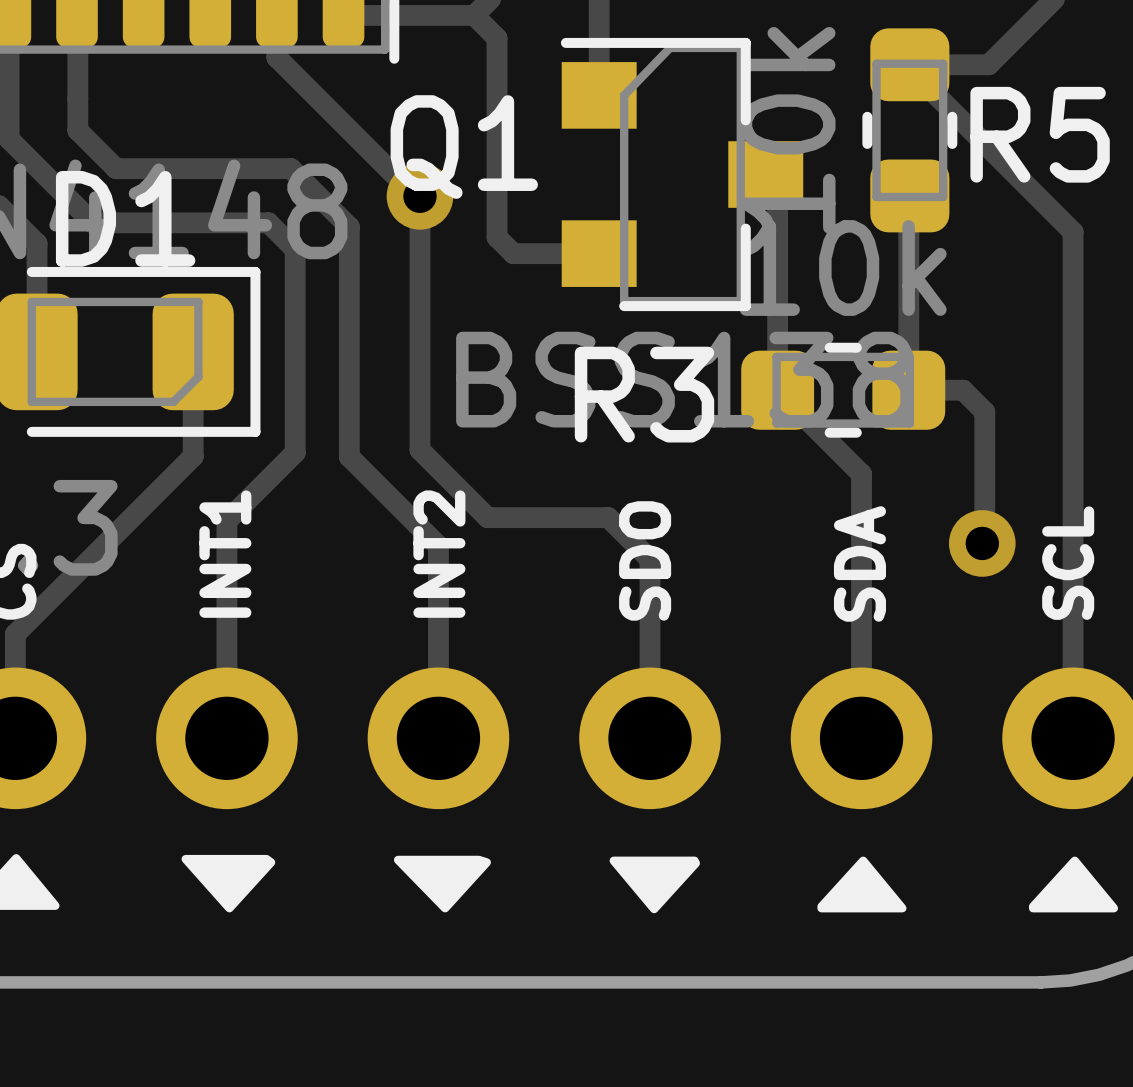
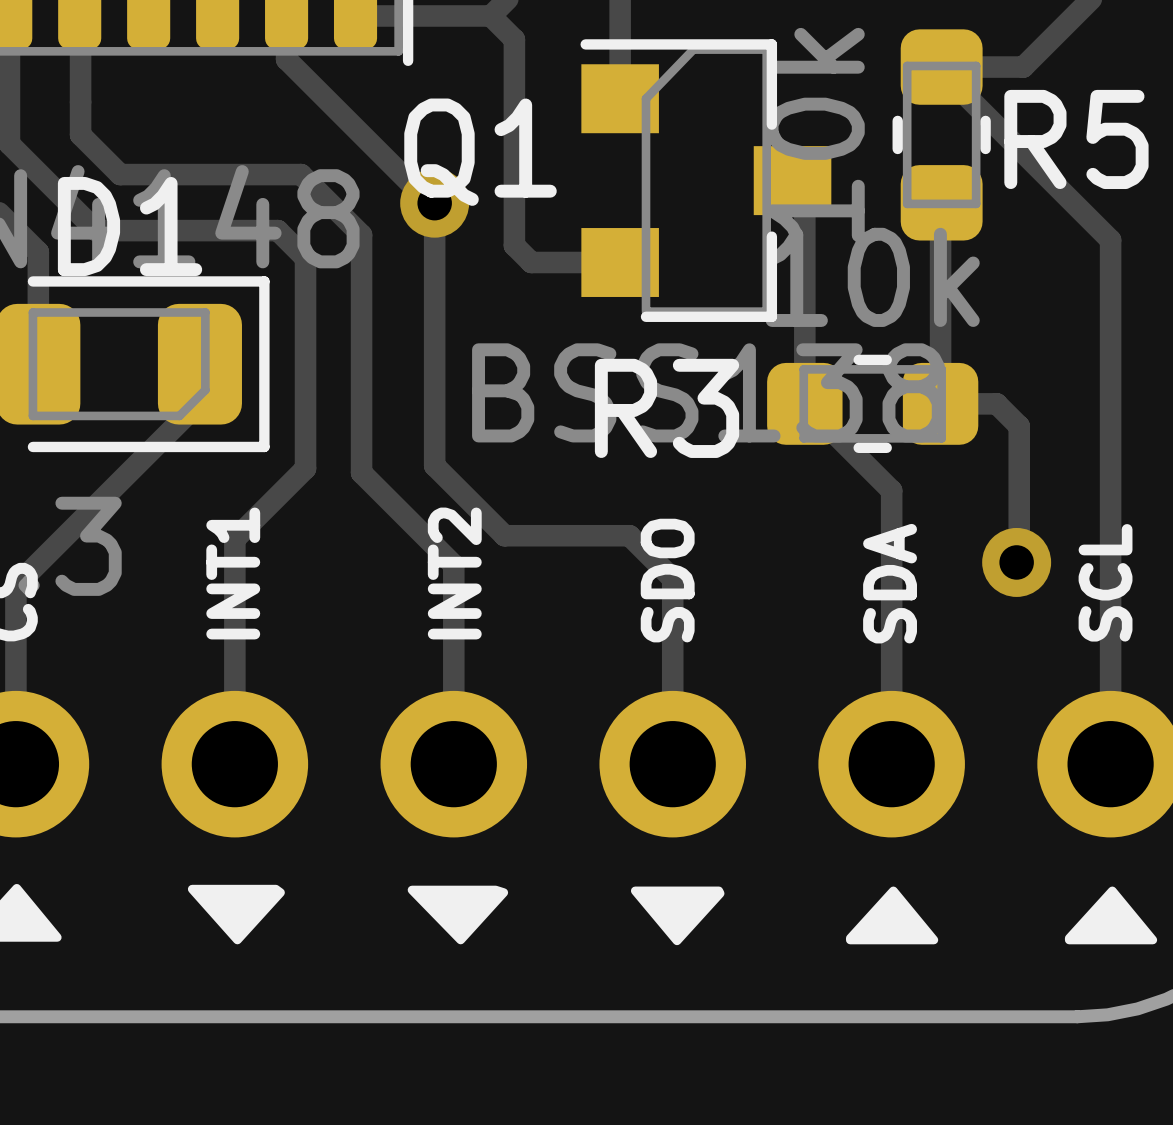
track: (193, 388) (193, 456) (15, 634) -> (199, 401) (15, 585) (15, 656)

